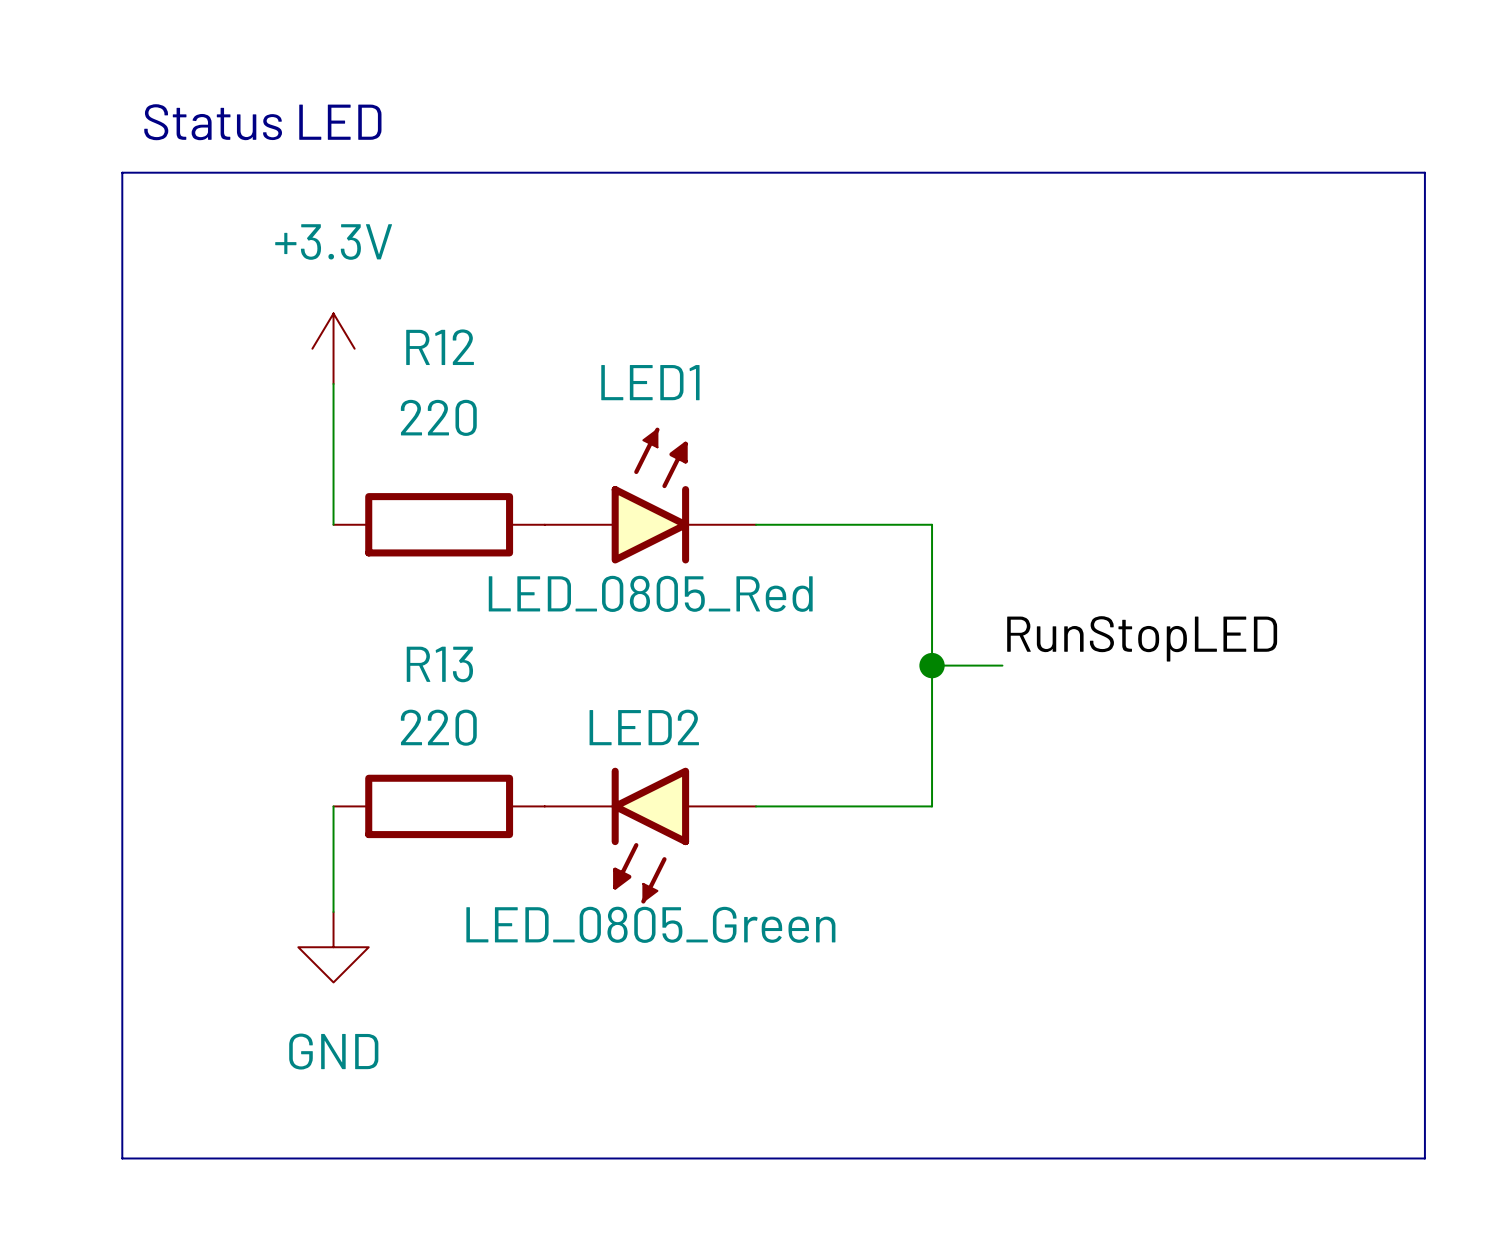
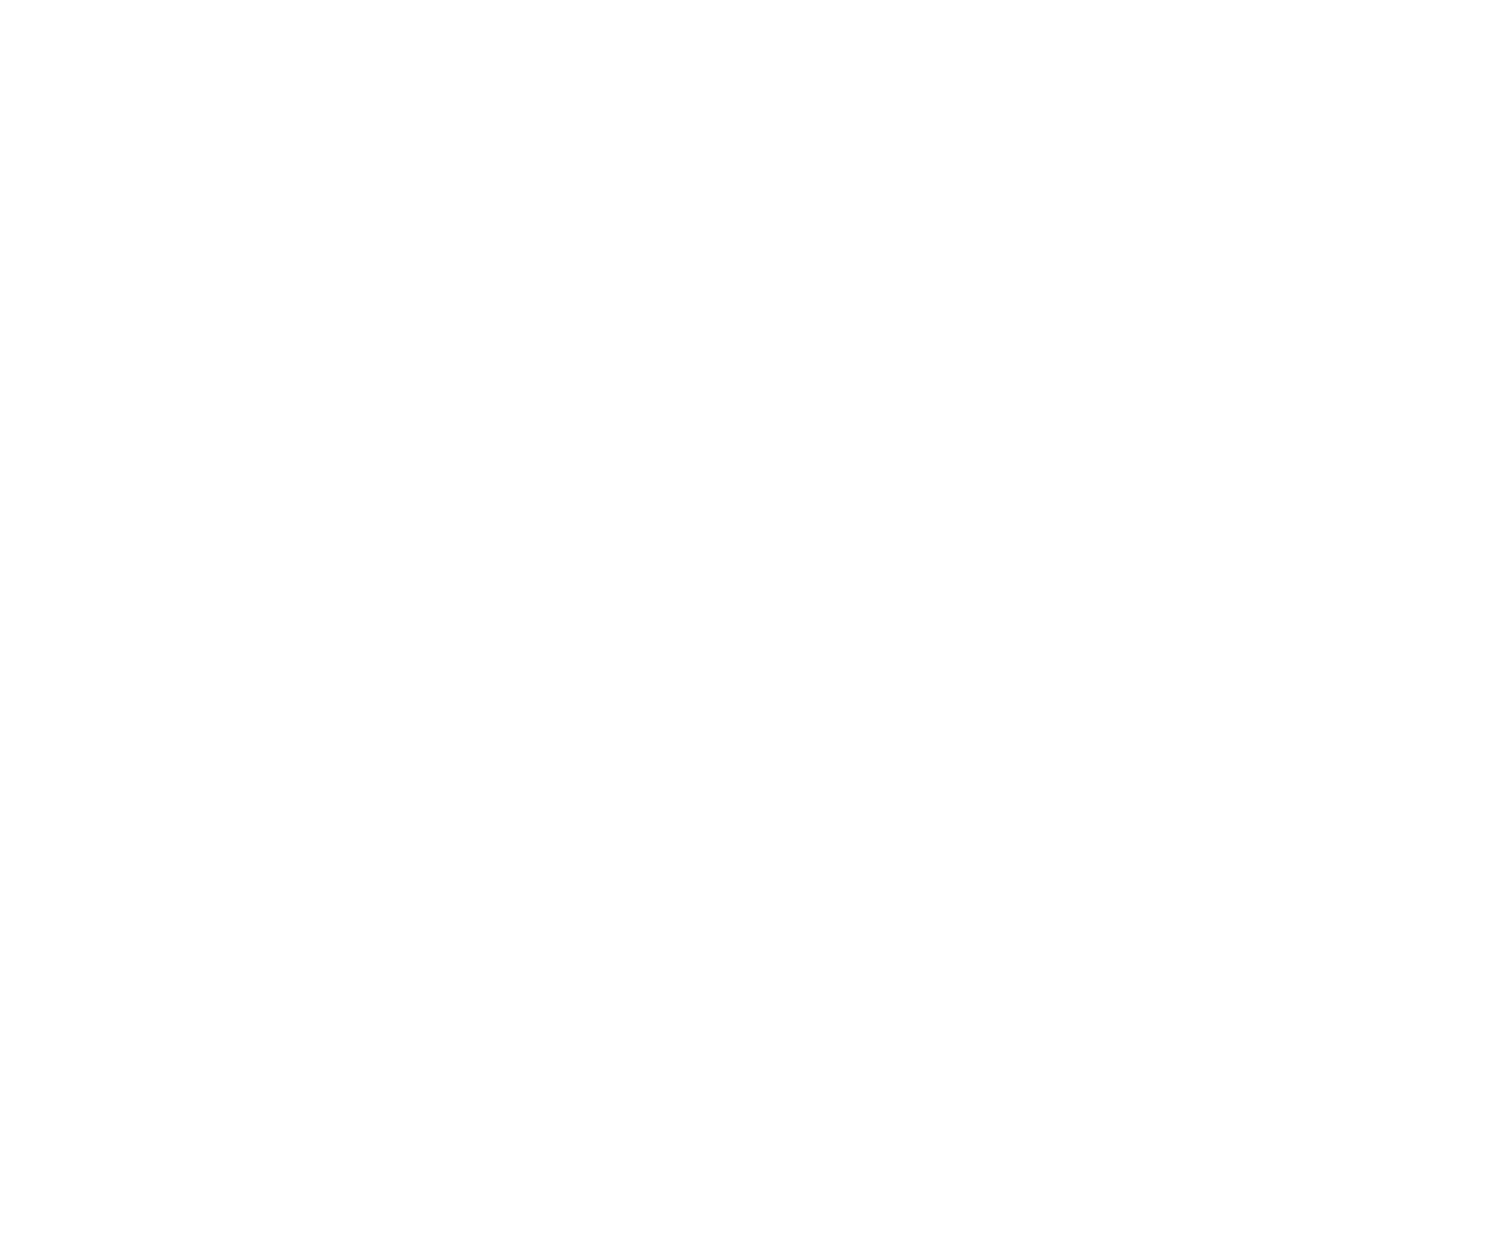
text: Status LED (262, 122) -> none
line: (122, 172) (1424, 172) (1424, 1158) (122, 1158) (122, 172) -> none
power symbol: +3.3V (333, 348) -> none
wire: (333, 383) (333, 524) -> none
LED1: LED_0805_Red (650, 495) -> none
R12: 220 (439, 524) -> none
wire: (756, 524) (932, 524) (932, 806) (756, 806) -> none
label: RunStopLED (1142, 638) -> none
wire: (932, 665) (1002, 665) -> none
junction: (932, 665) -> none
wire: (333, 806) (333, 912) -> none
R13: 220 (439, 806) -> none
LED2: LED_0805_Green (650, 835) -> none
power symbol: GND (333, 947) -> none

